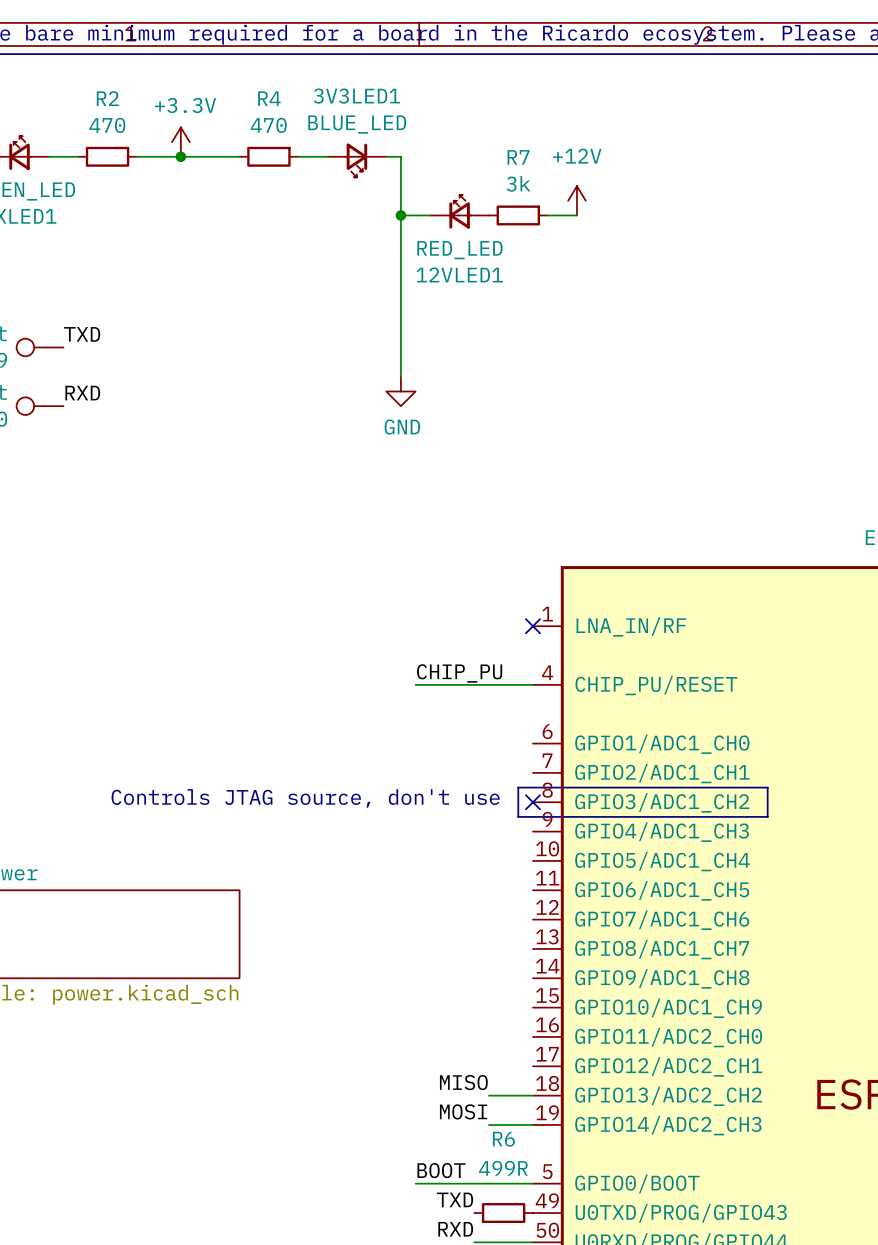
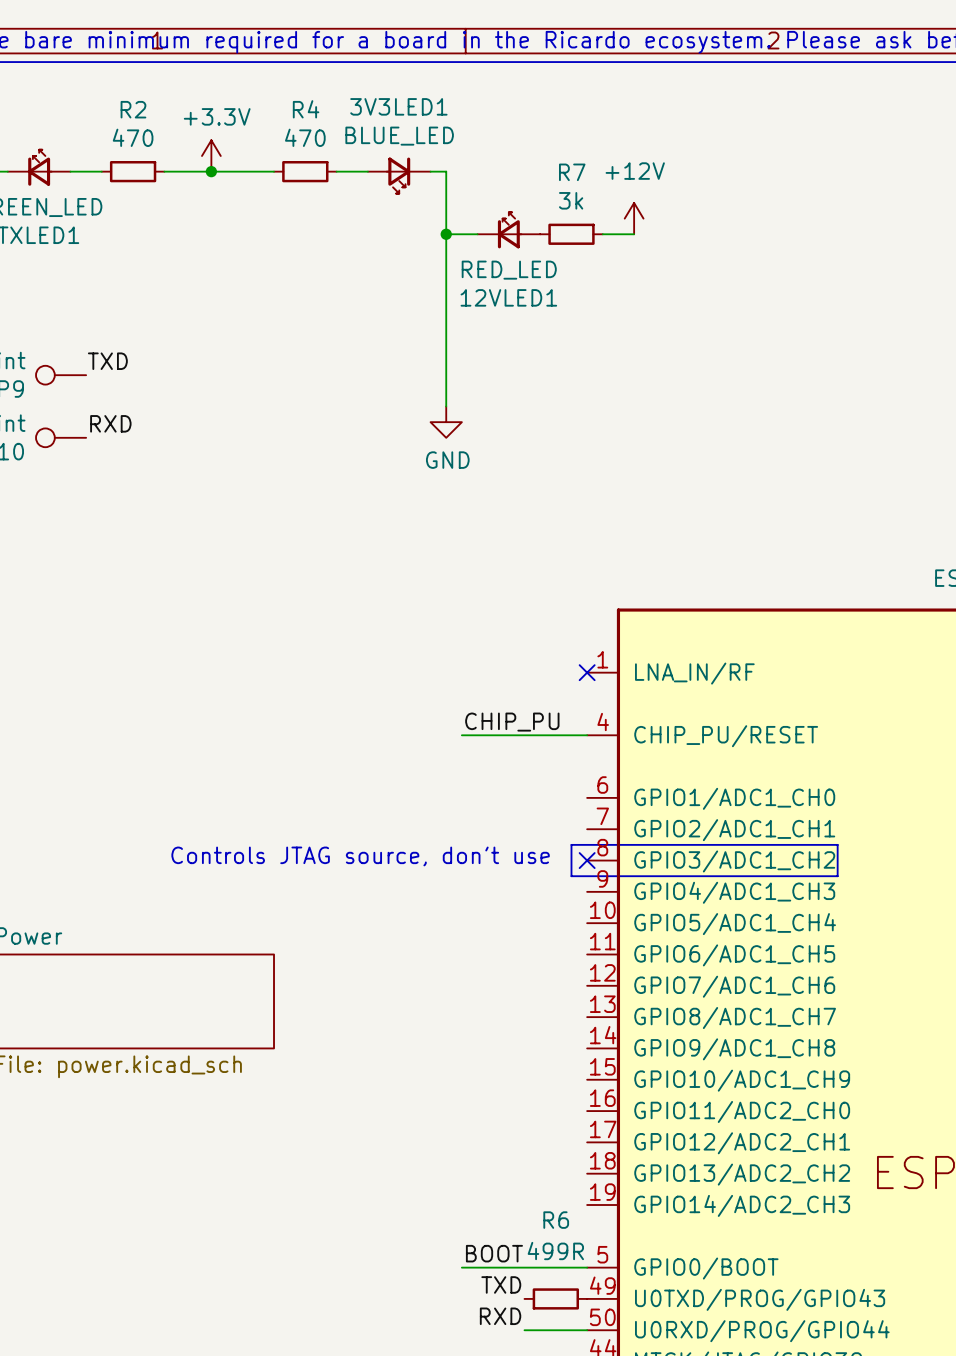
label: MISO (463, 1082) -> none
wire: (488, 1095) (532, 1095) -> none
label: MOSI (463, 1111) -> none
wire: (488, 1124) (532, 1124) -> none

